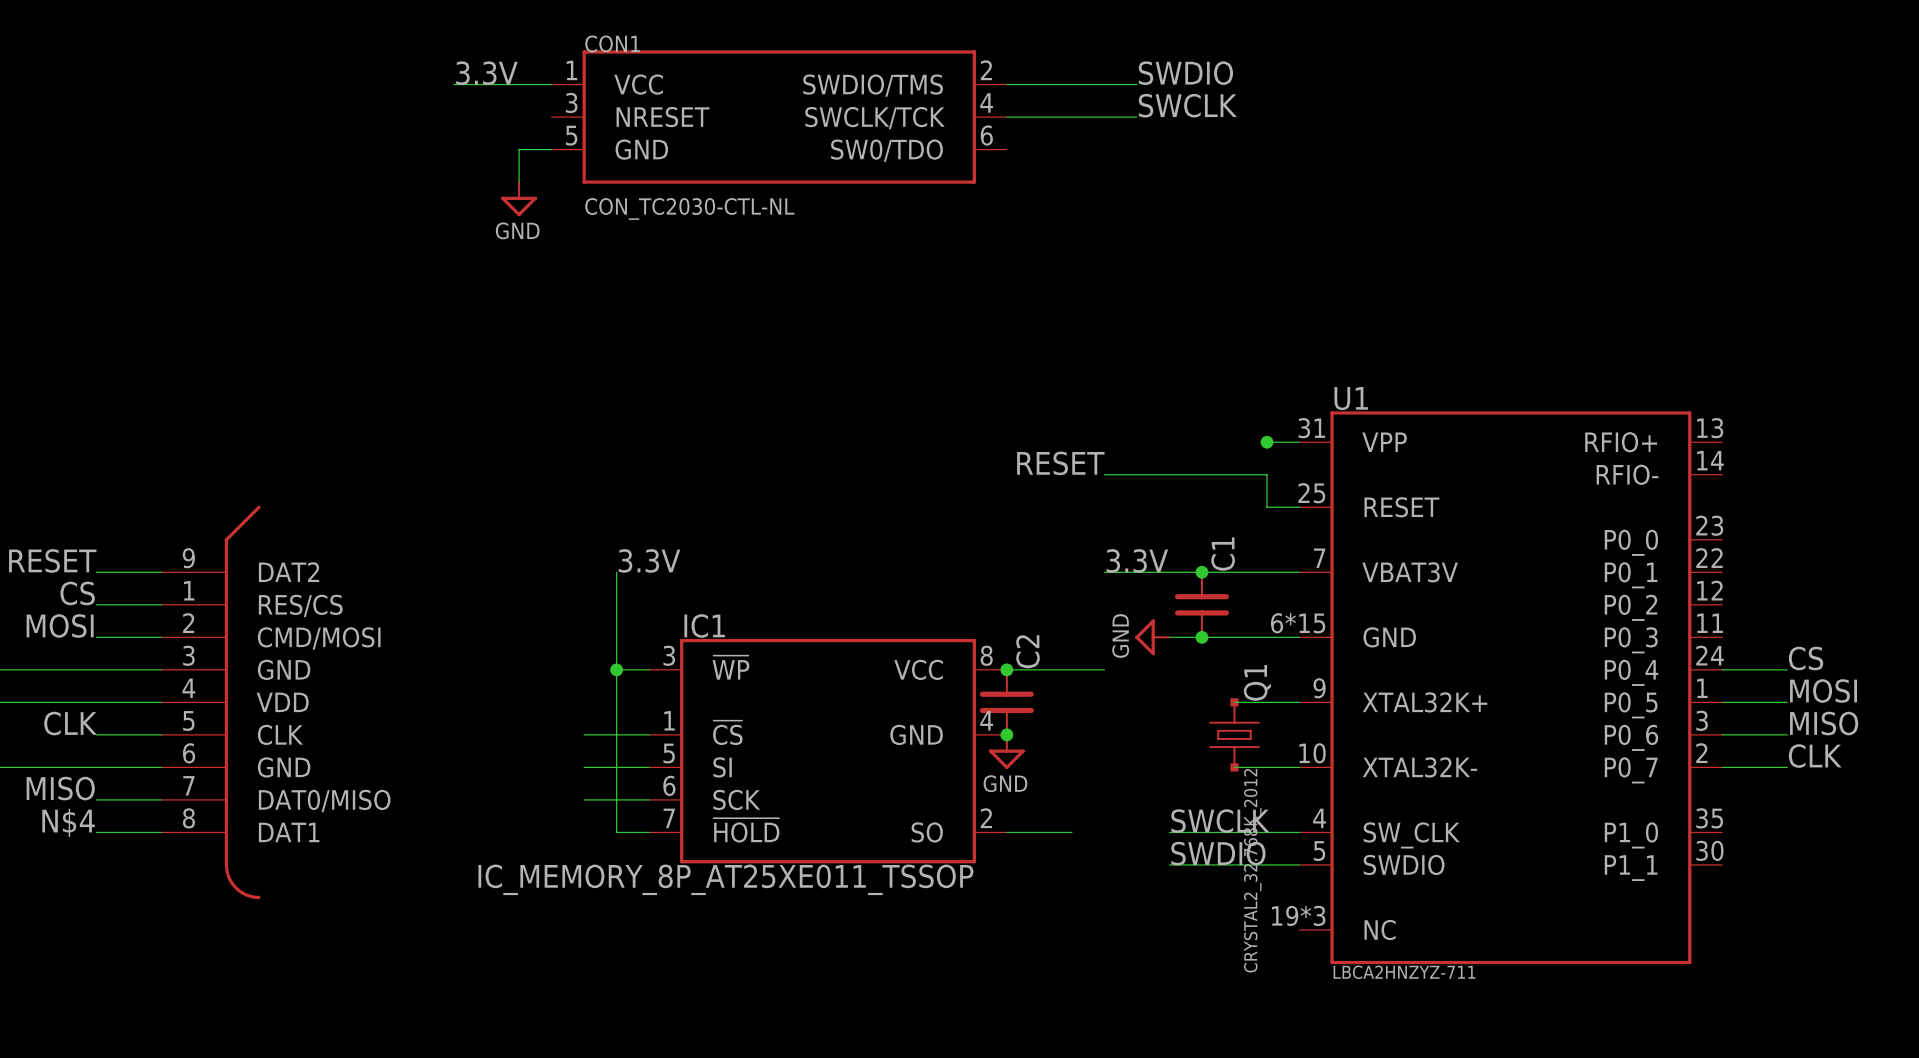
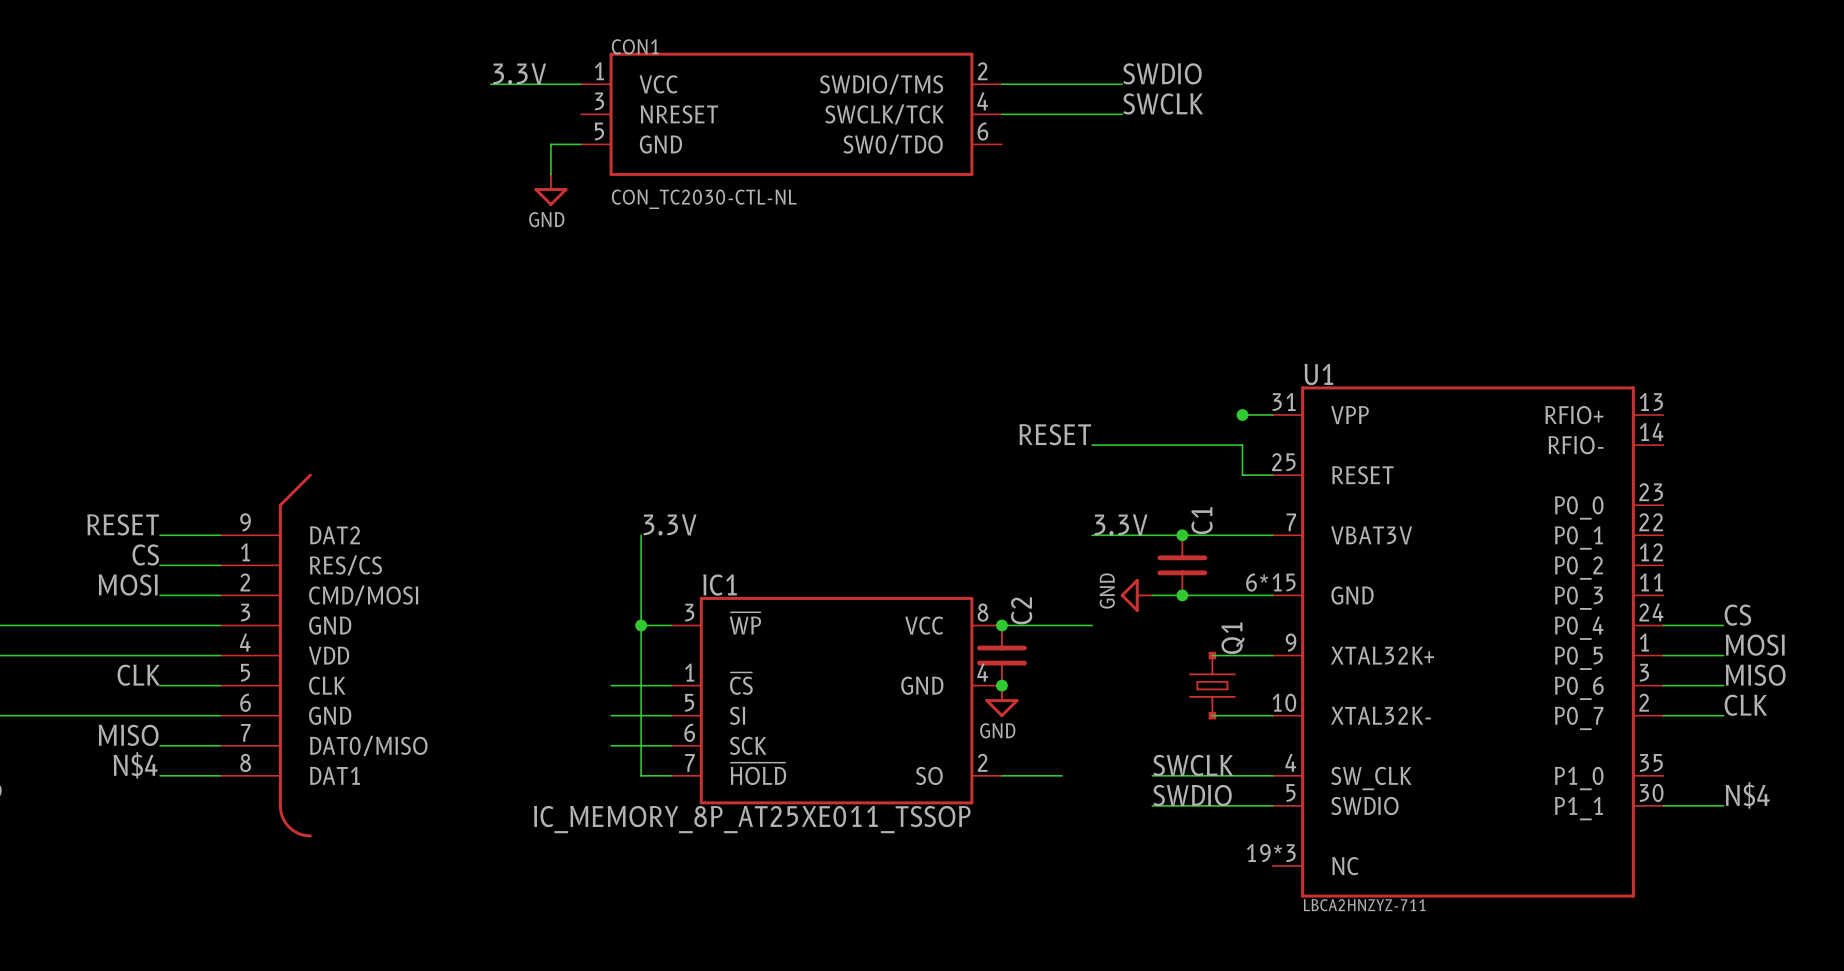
label: none -> N$4 (1747, 795)
wire: none -> (1663, 805) (1723, 805)
Q1 value: CRYSTAL2_32.768K_2012 (1252, 870) -> none

